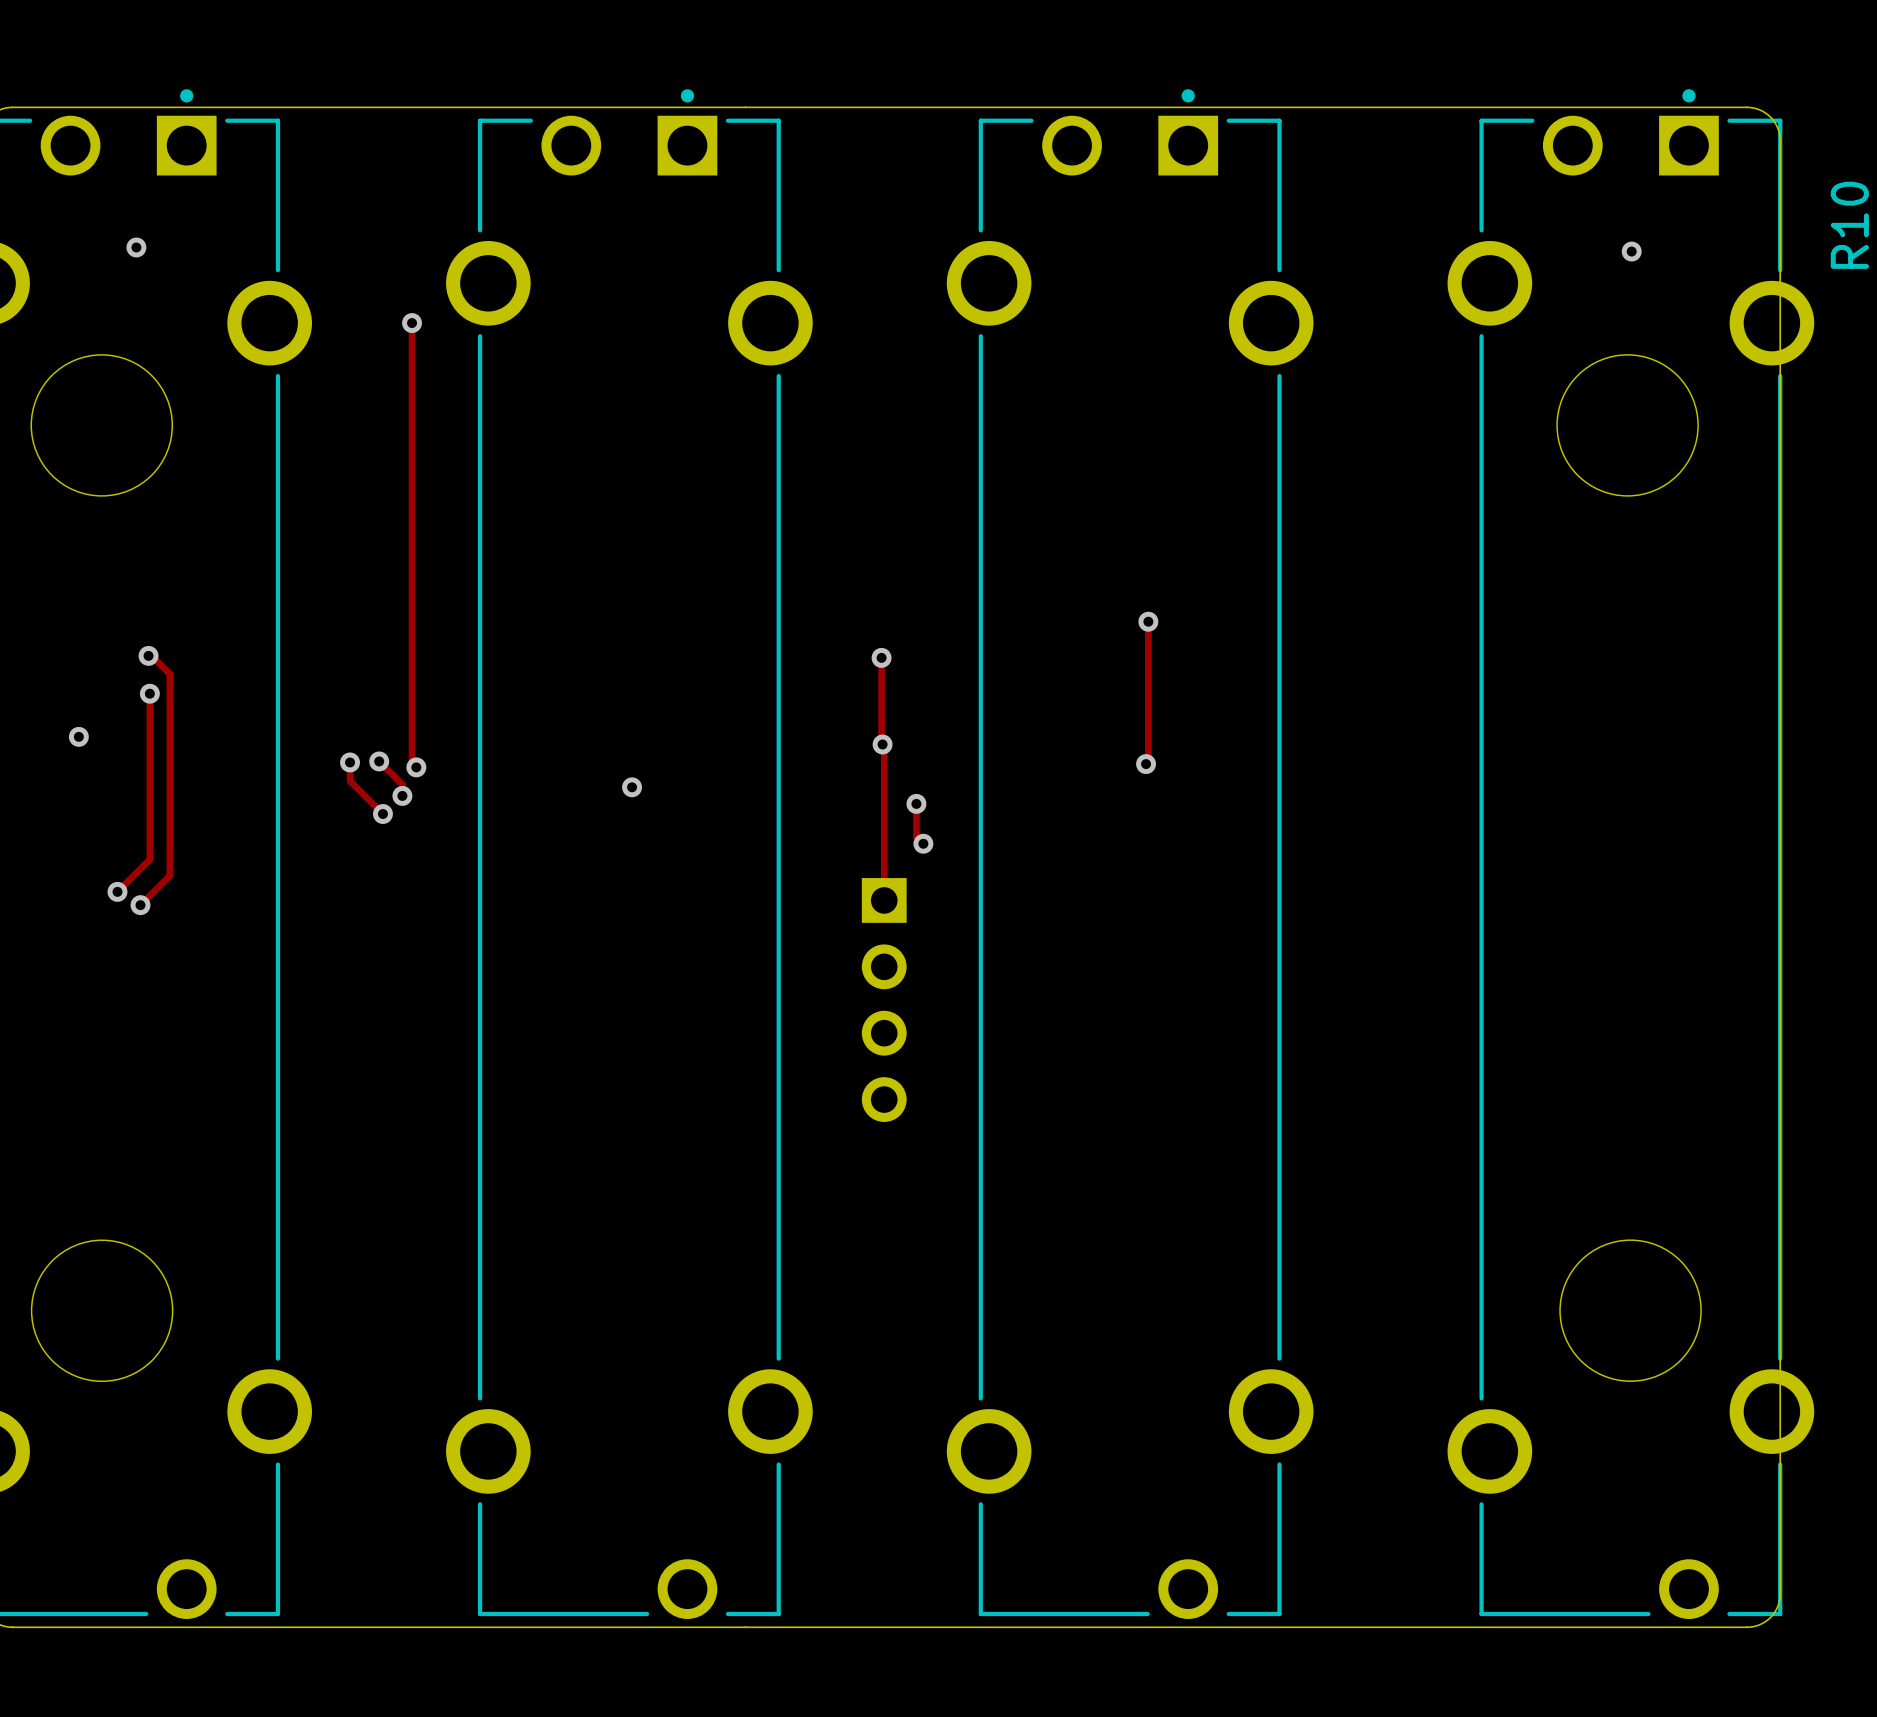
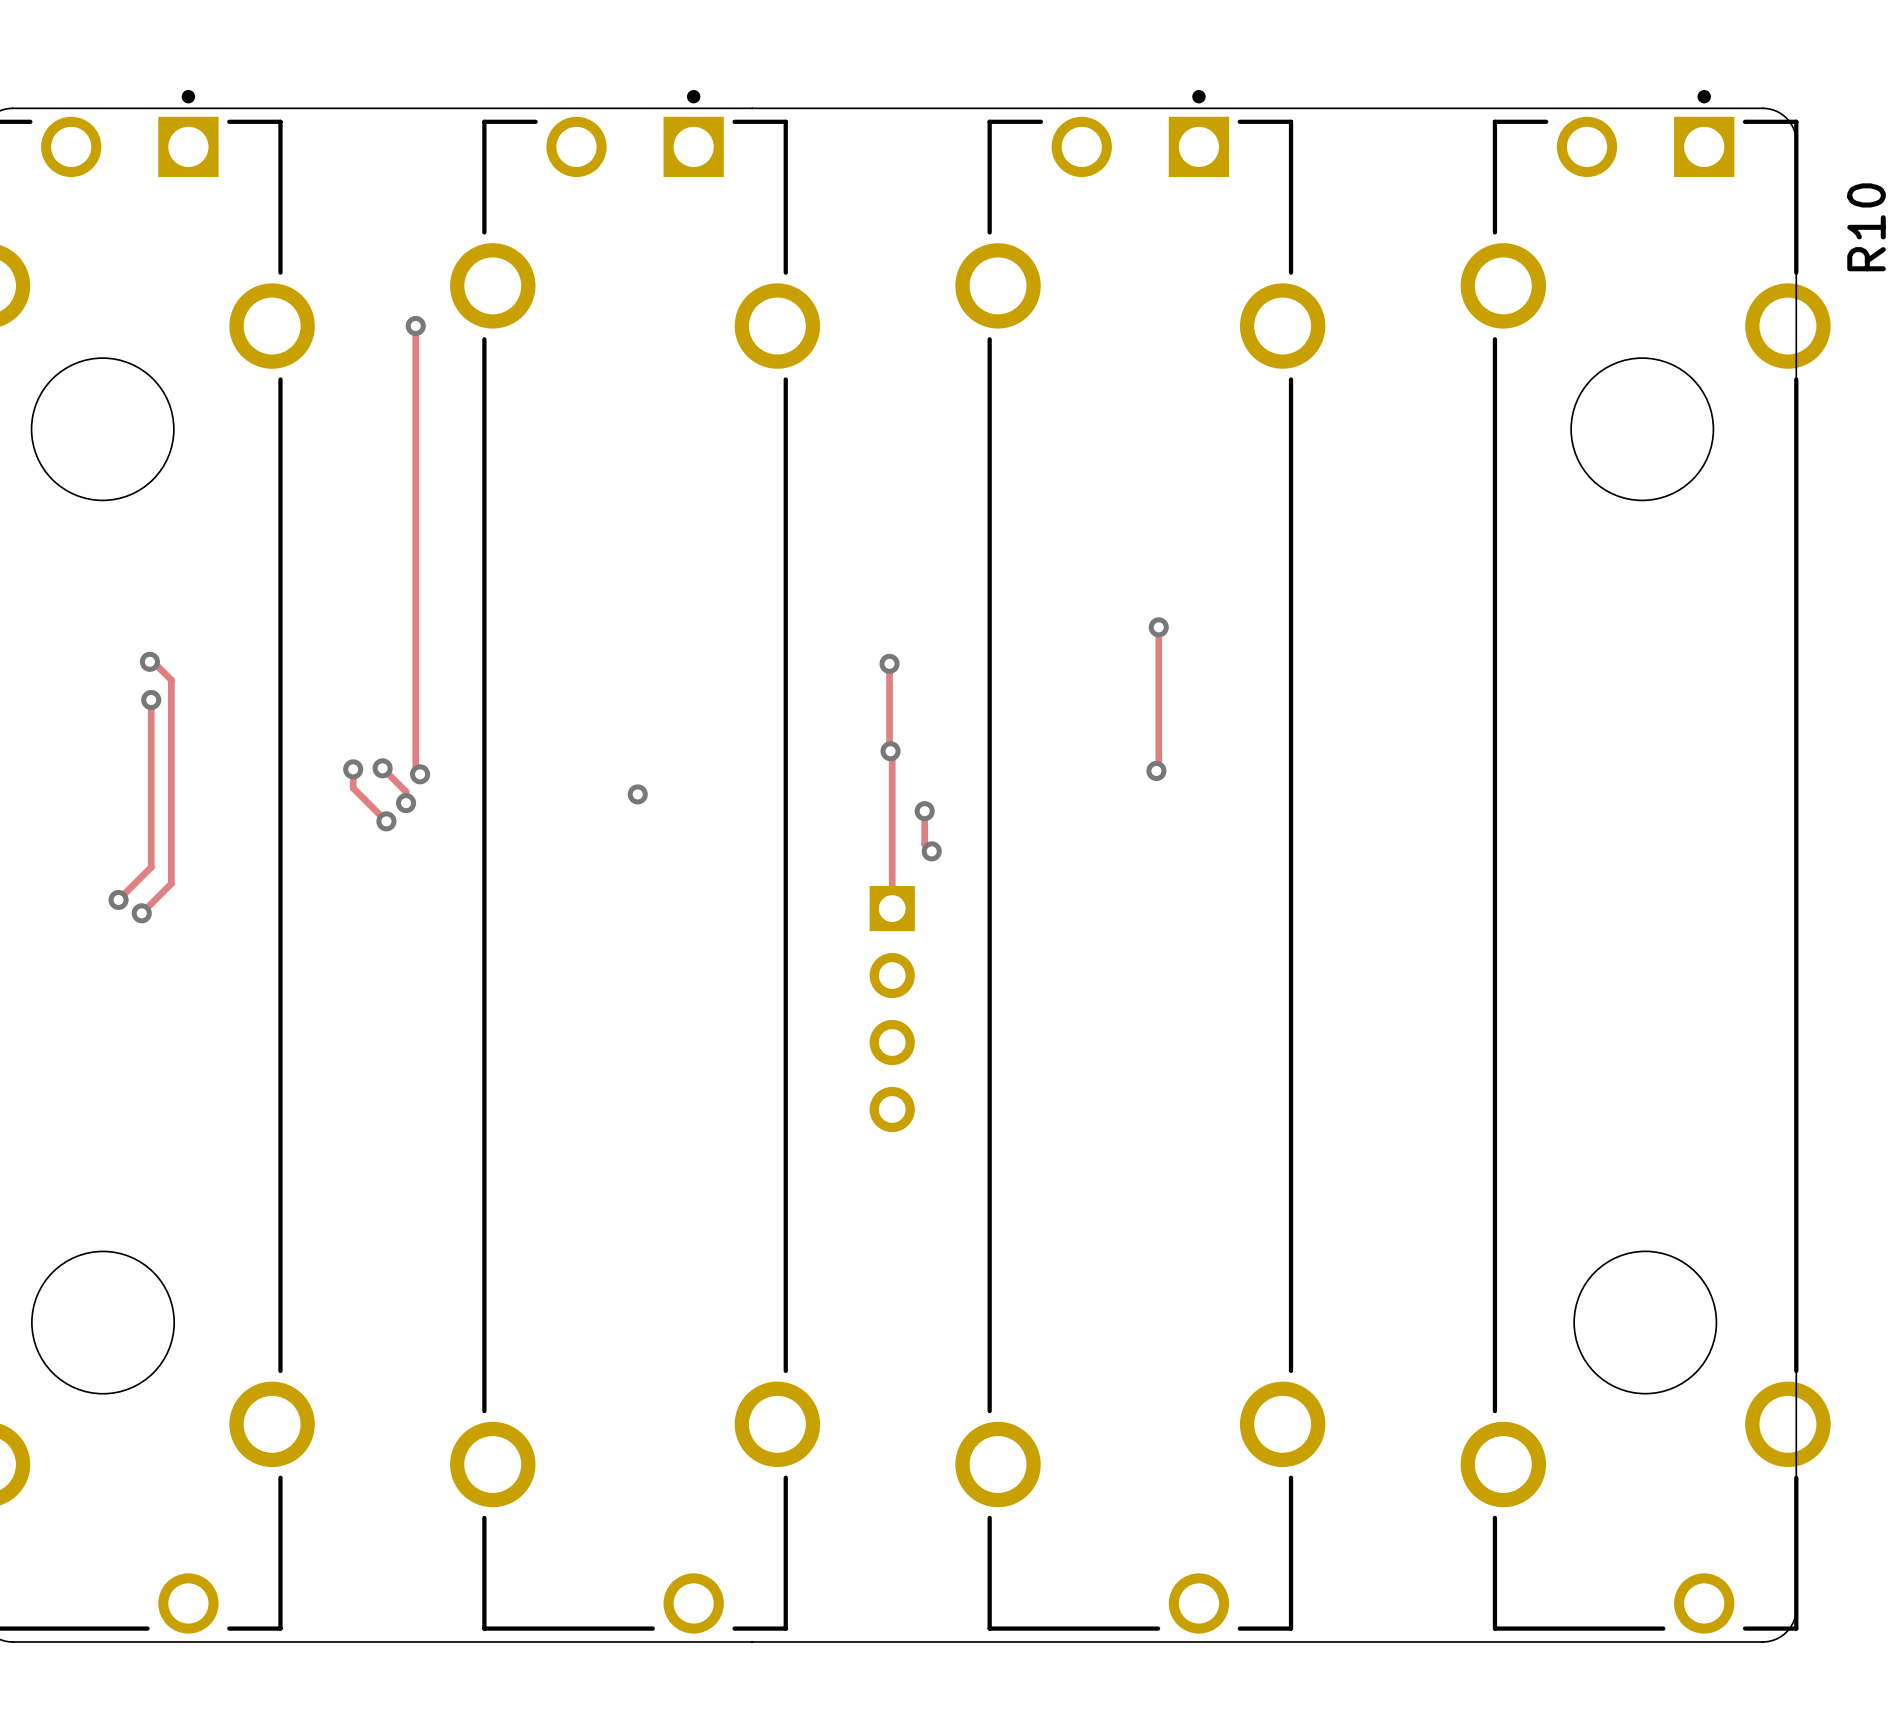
via: (136, 247) -> none
via: (1631, 251) -> none
via: (78, 736) -> none

